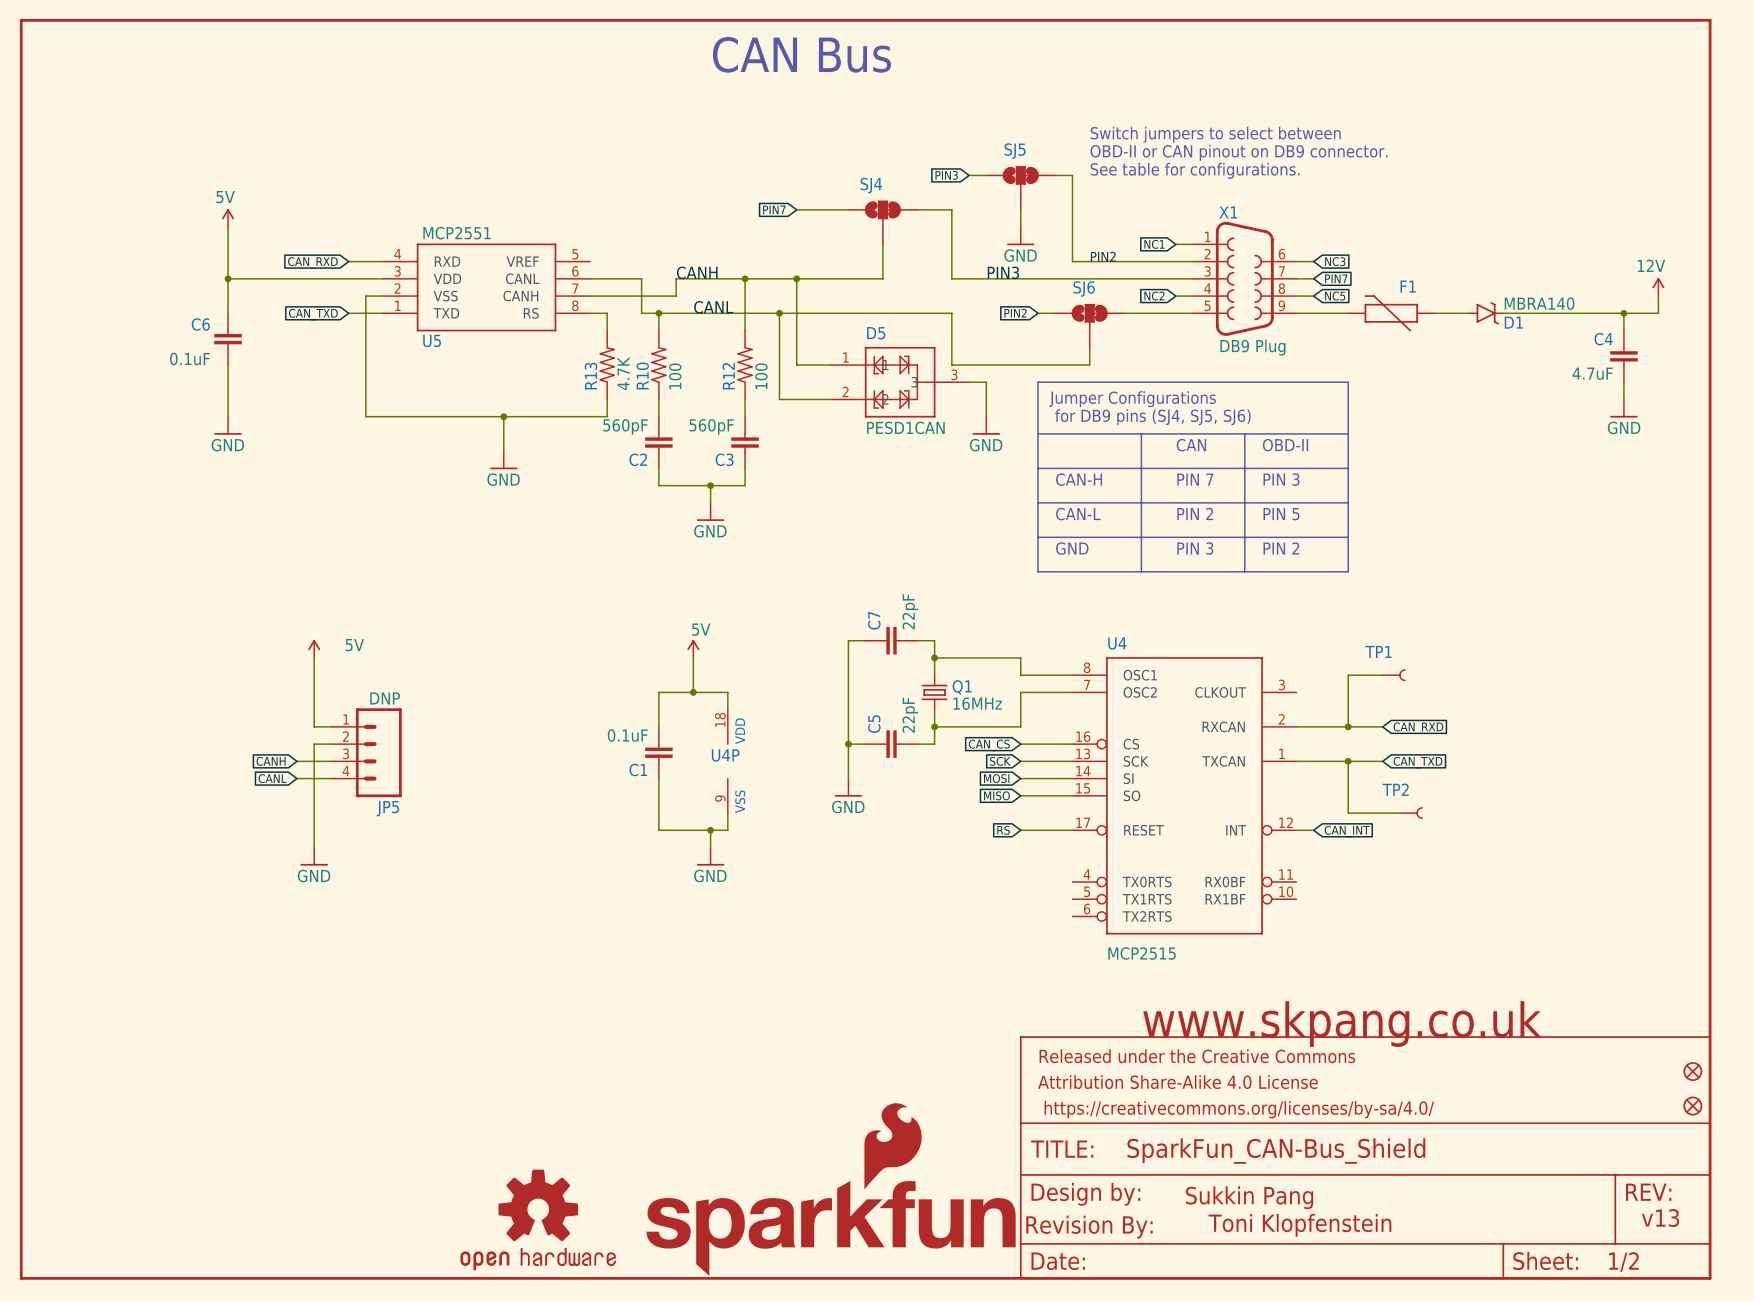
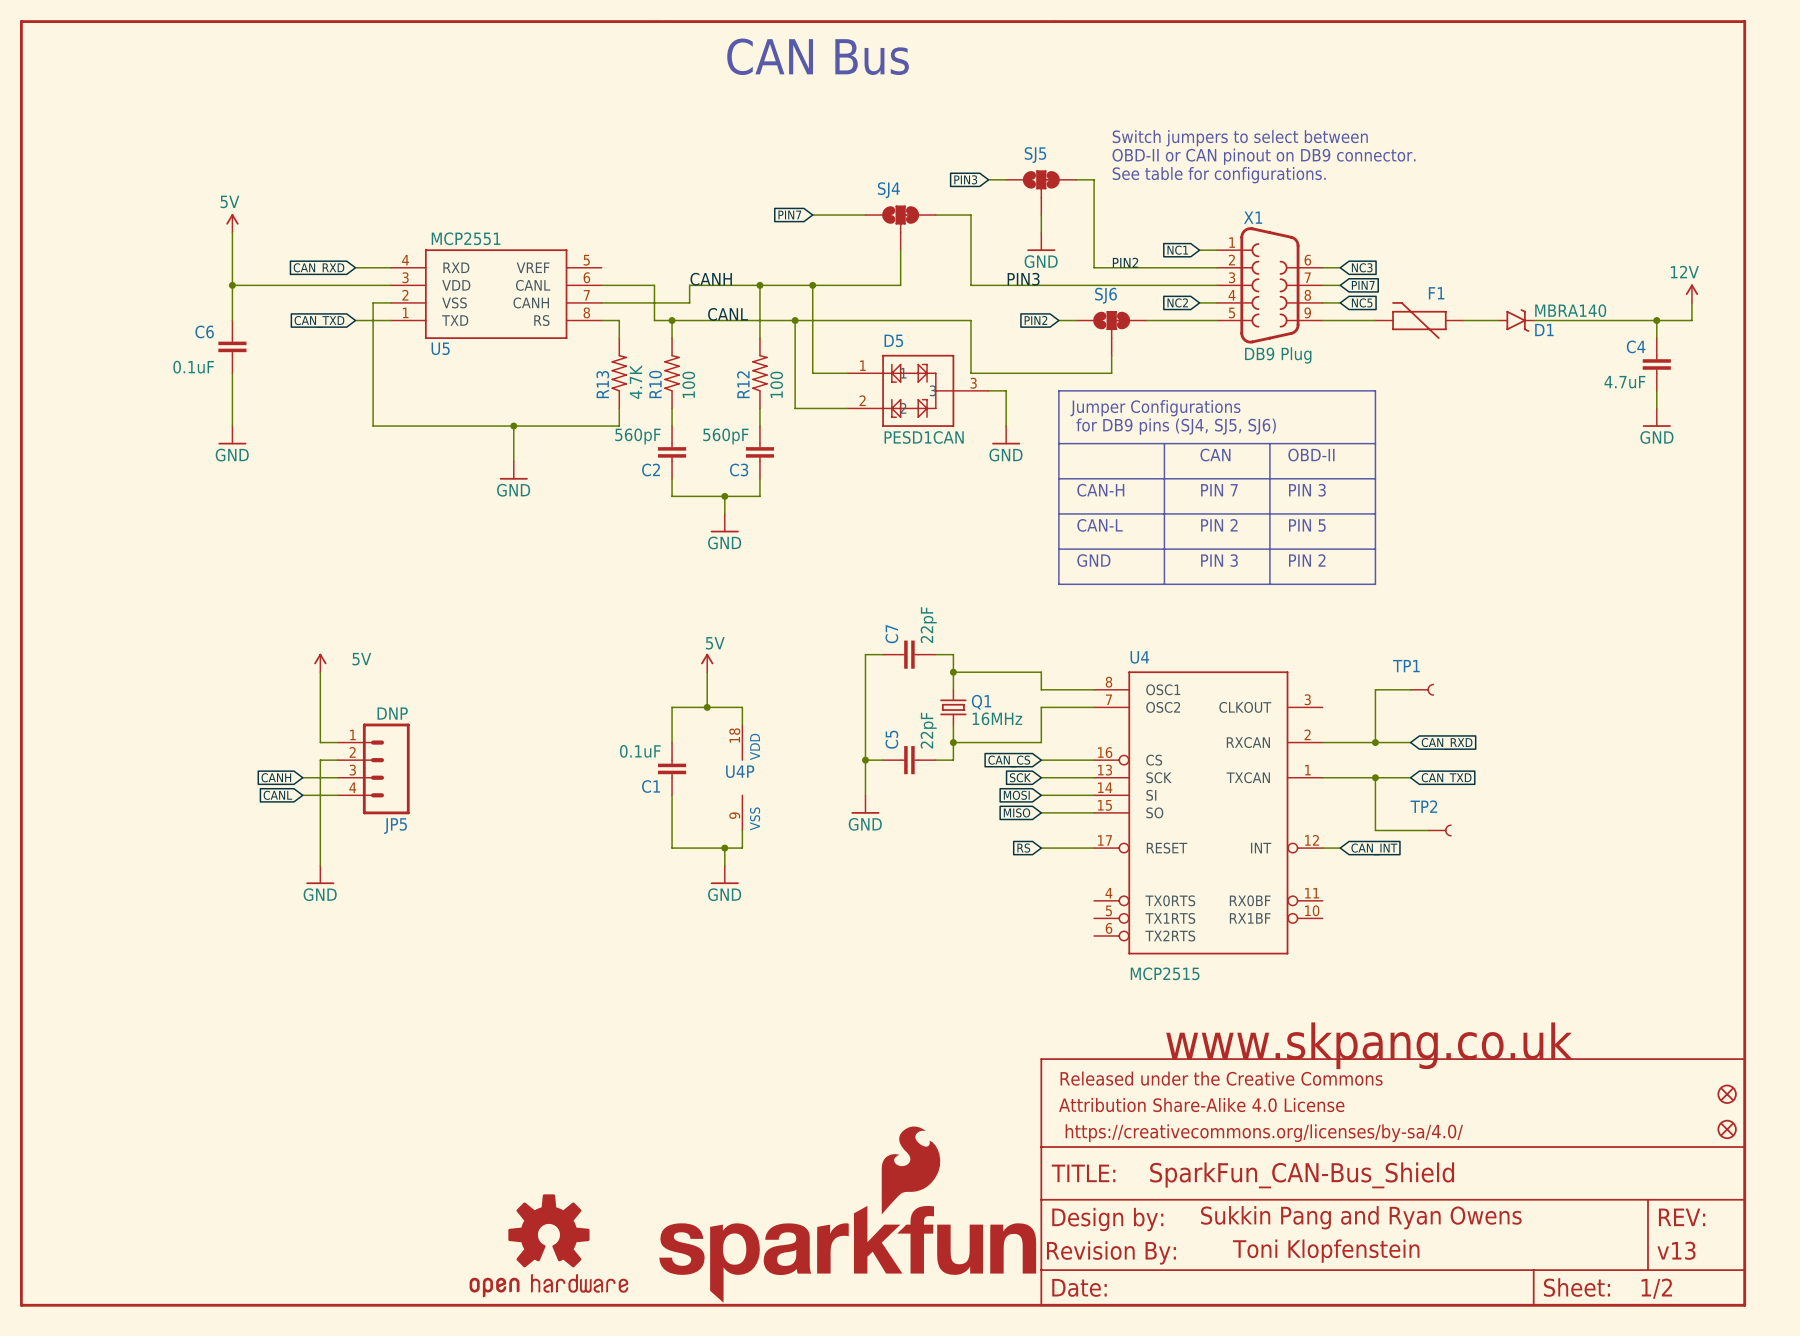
part text: none -> Sukkin Pang and Ryan Owens (1361, 1217)
text: Sukkin Pang (1249, 1197) -> none
text: v13 (1660, 1218) -> none
part text: none -> v13 (1676, 1250)

